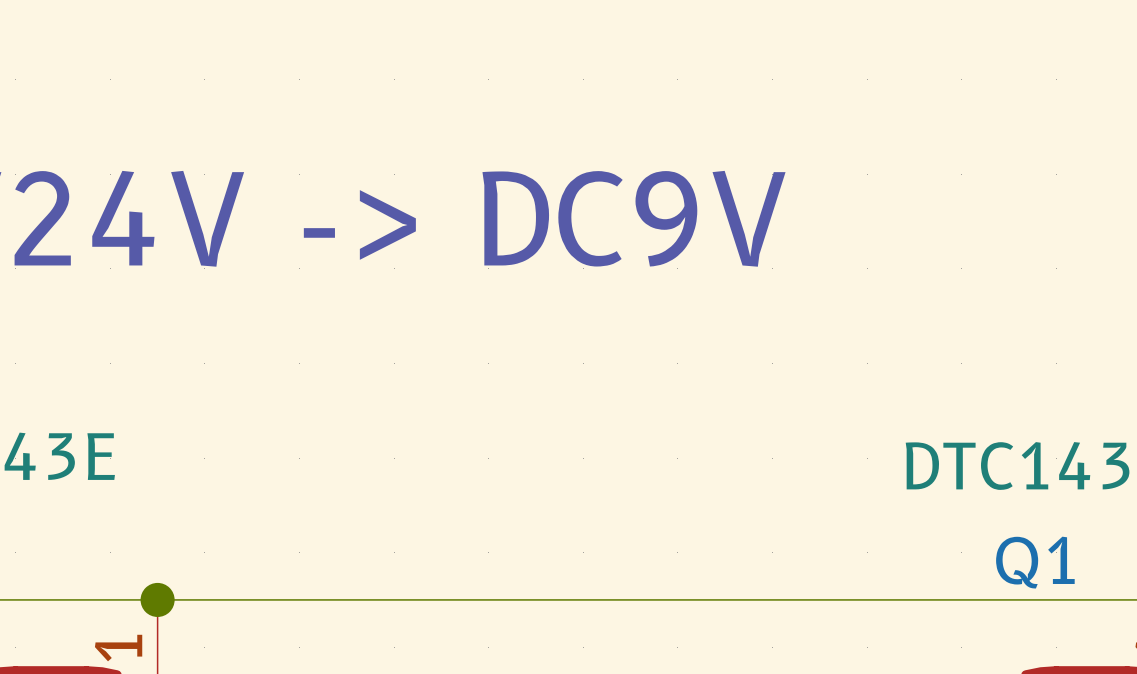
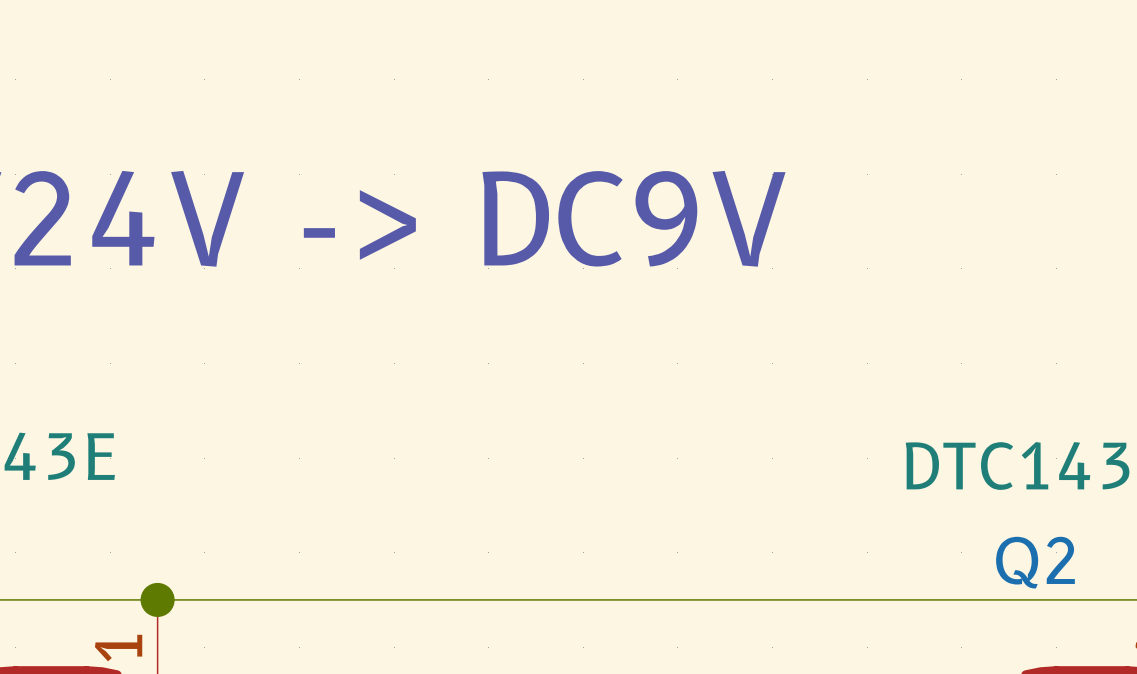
Q1 name: Q1 (1035, 562) -> Q2 (1035, 562)

